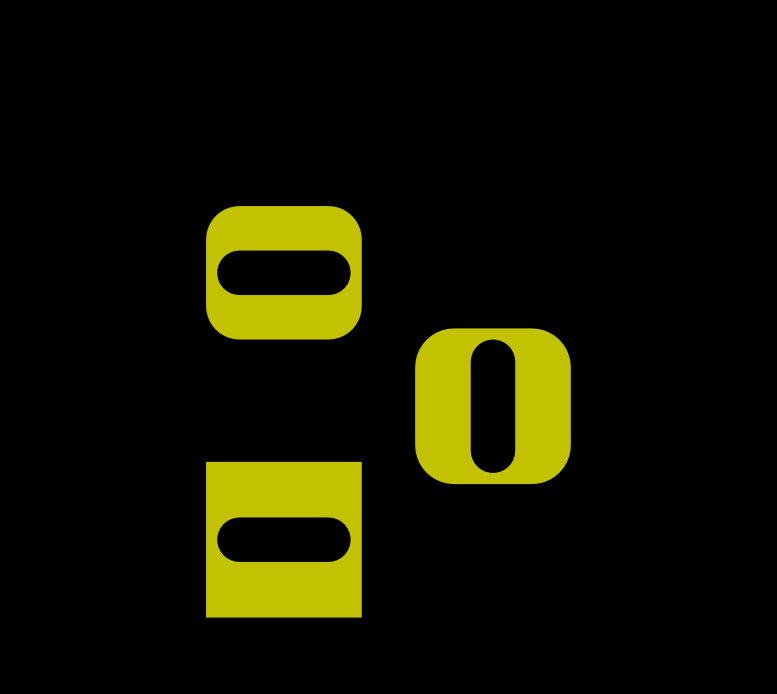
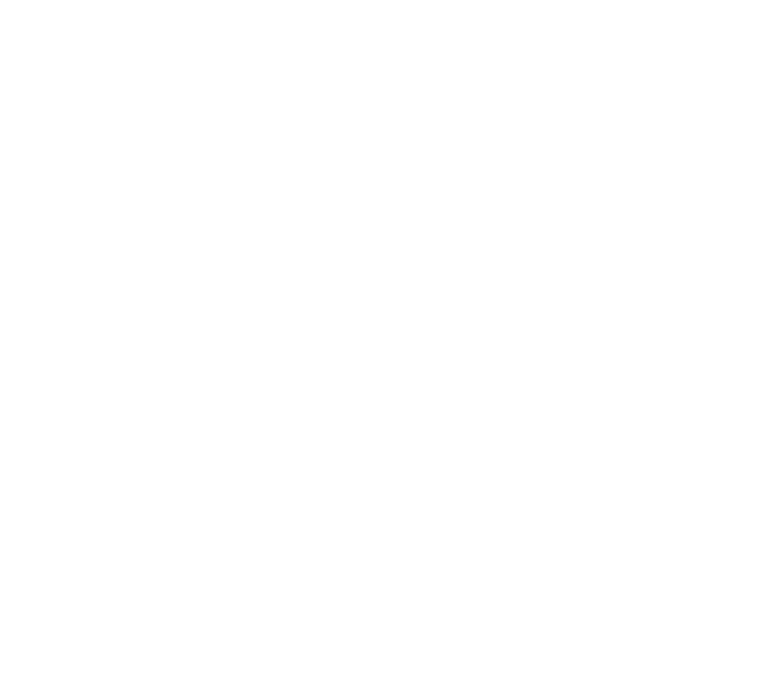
part: (388, 411) -> none

